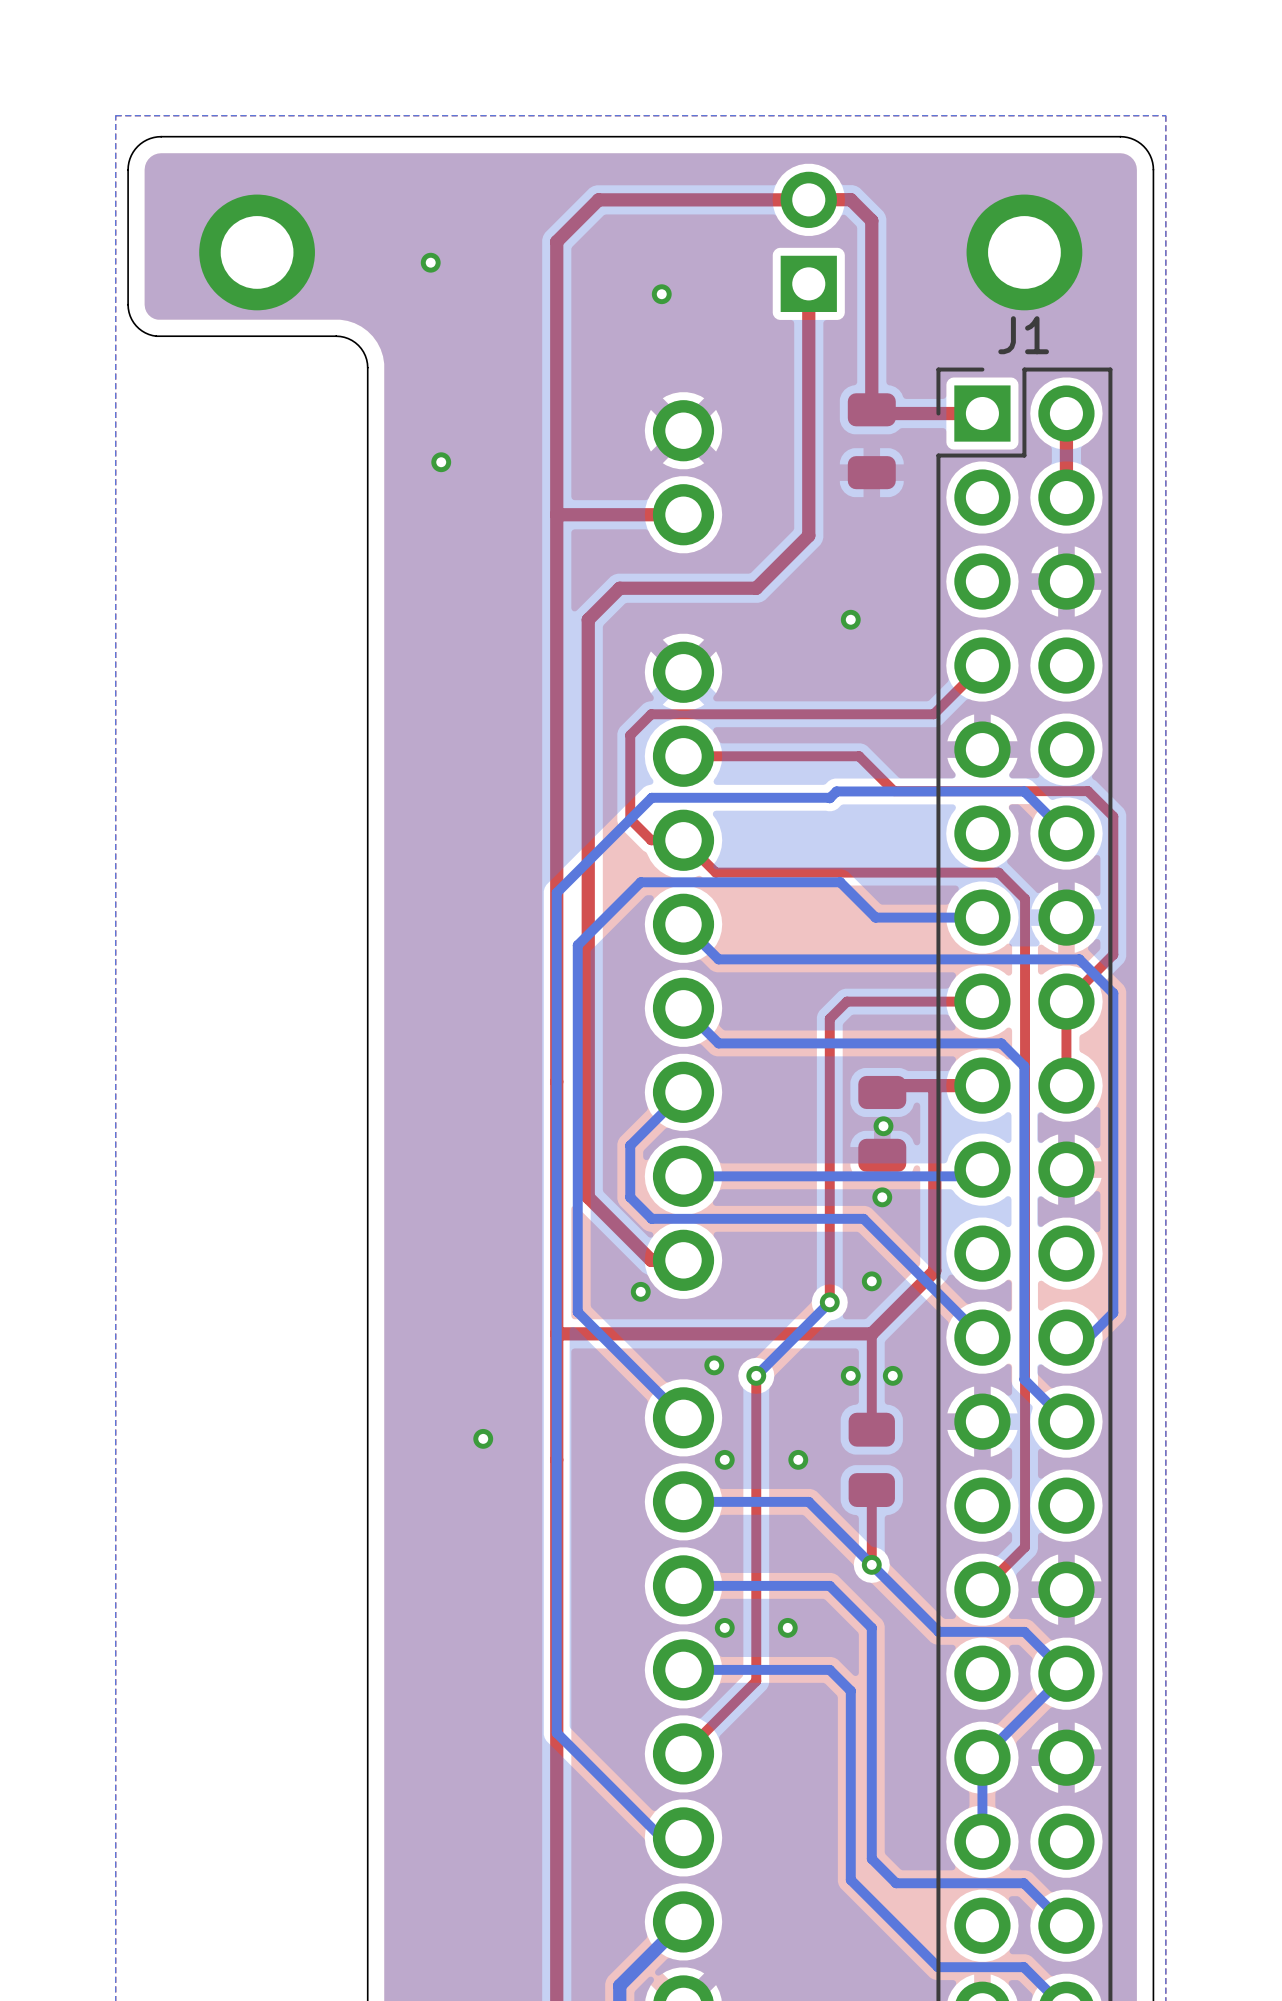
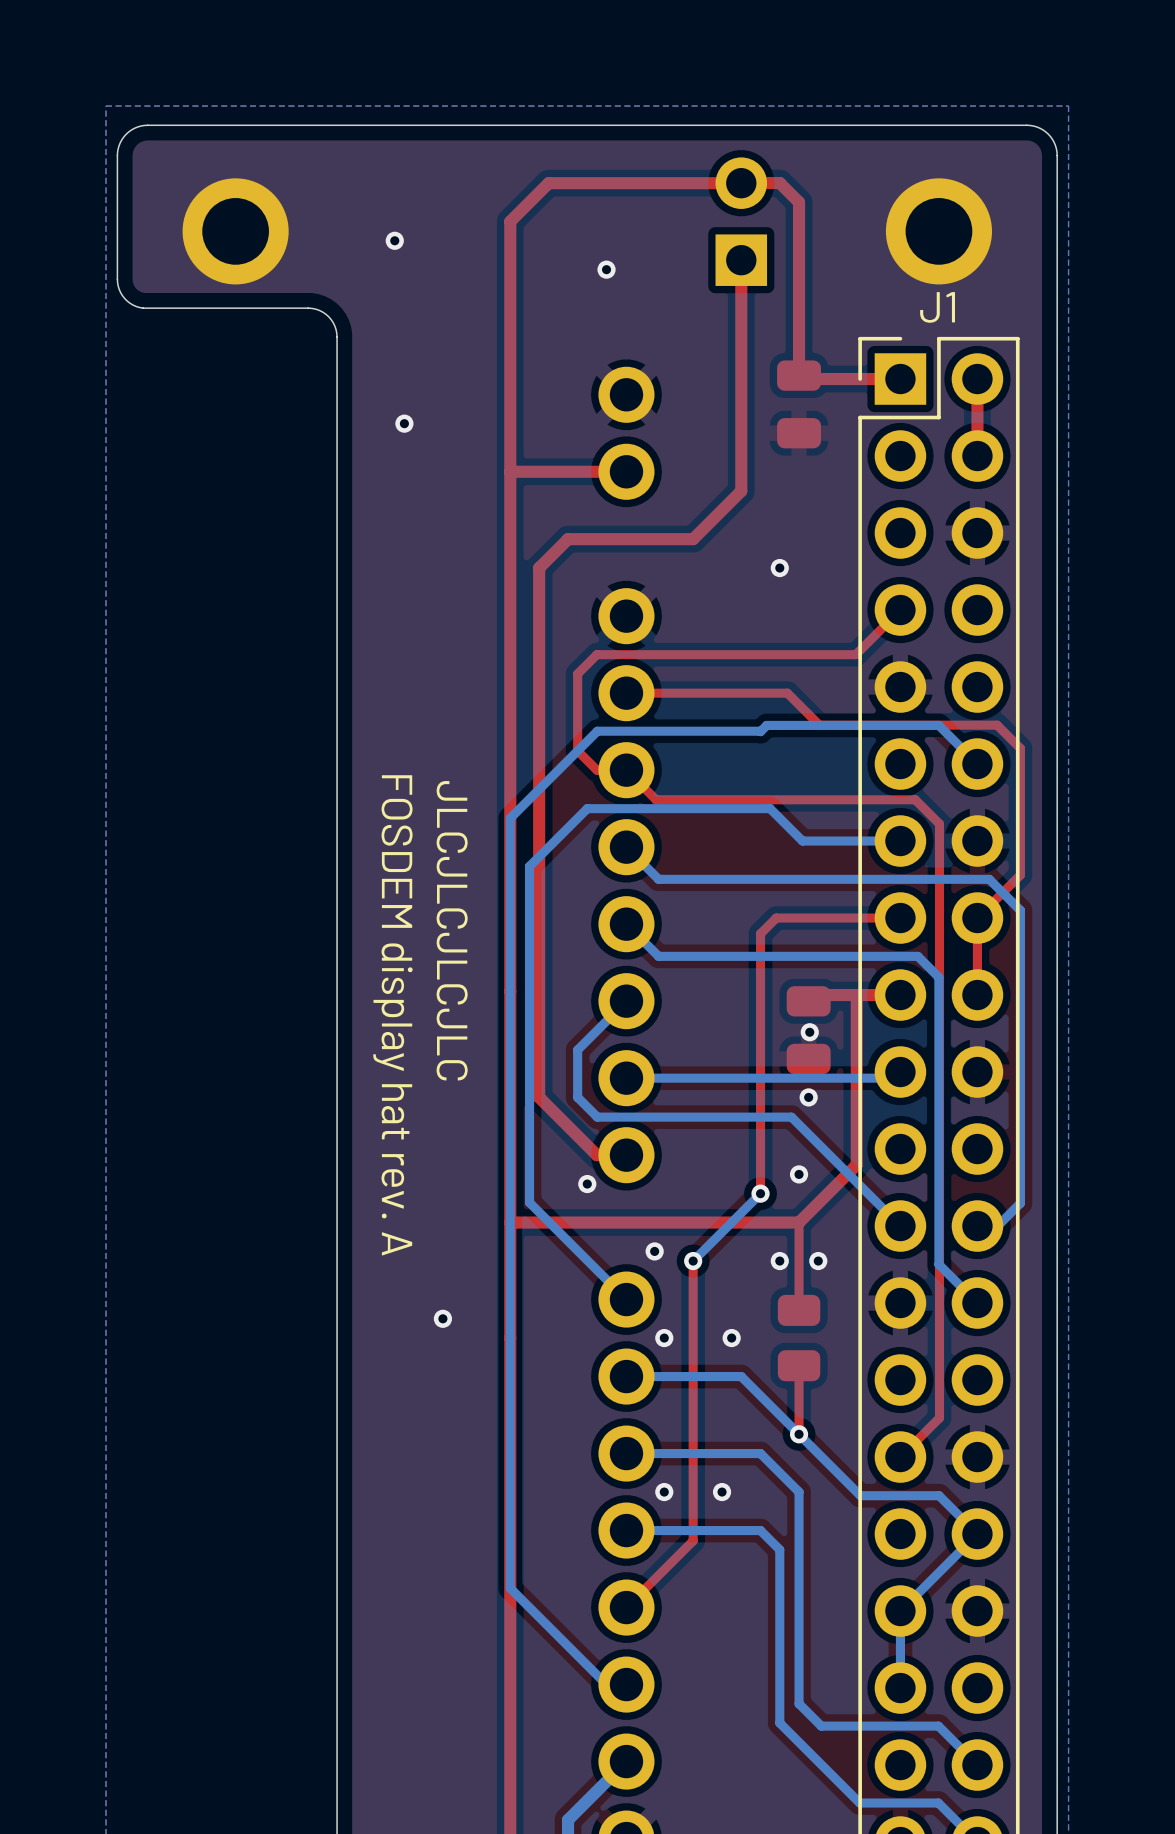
text: none -> JLCJLCJLCJLC (452, 930)
text: none -> FOSDEM display hat rev. A (392, 1015)

